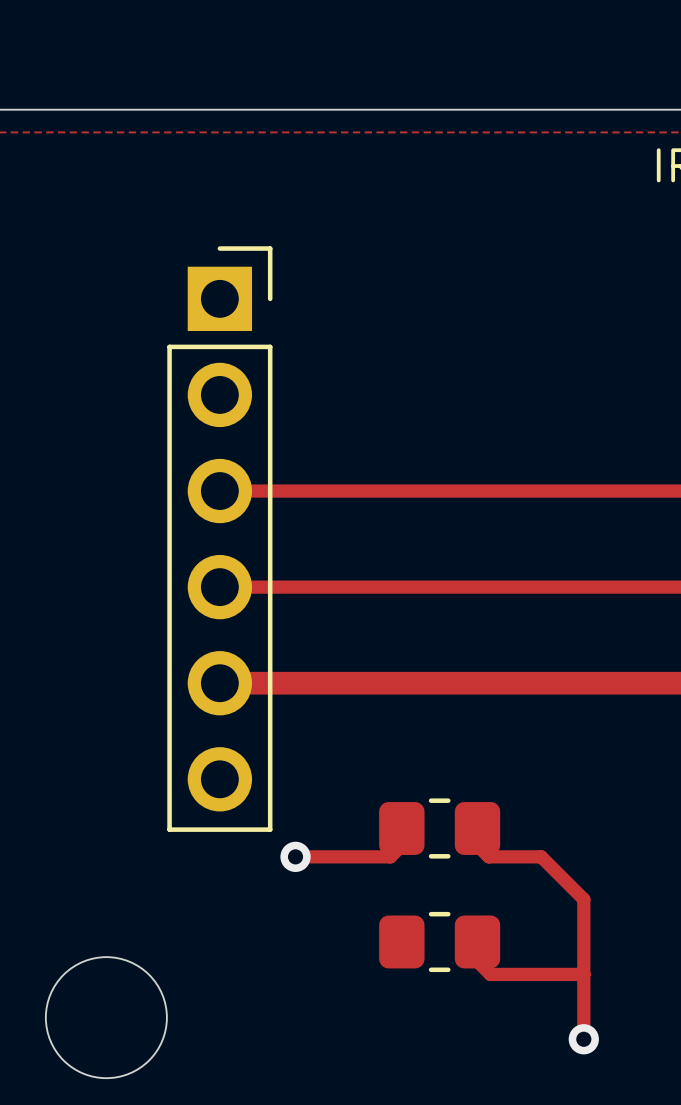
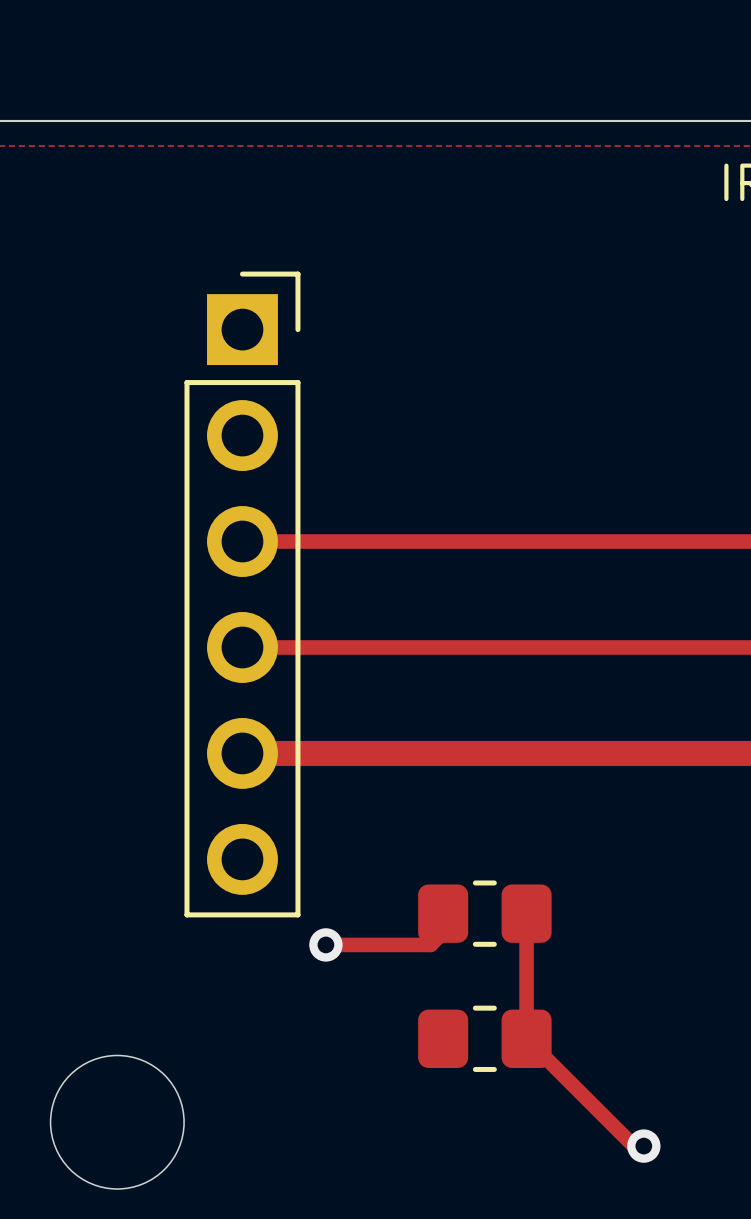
track: (477, 845) (488, 856) (541, 856) (583, 899) (583, 1039) -> (526, 932) (526, 1038) (633, 1146) (643, 1146)
track: (477, 941) (477, 961) (490, 974) (583, 974) -> none

